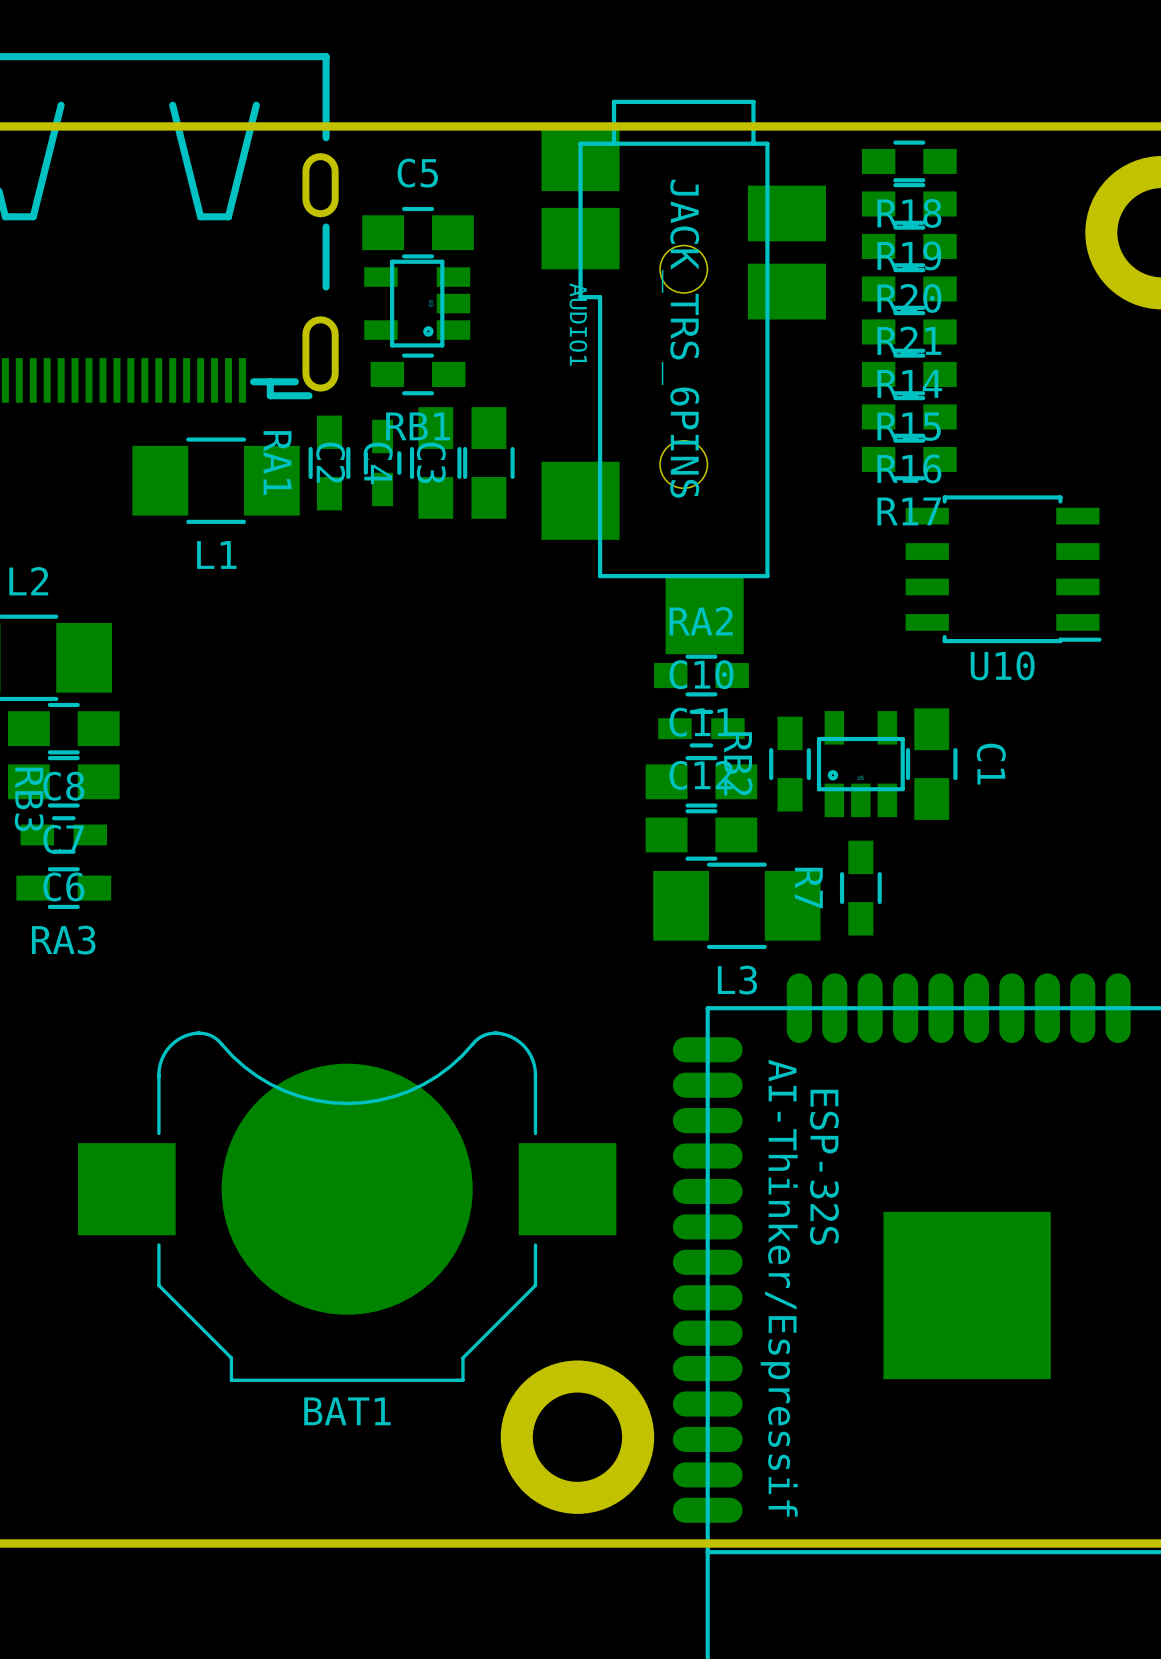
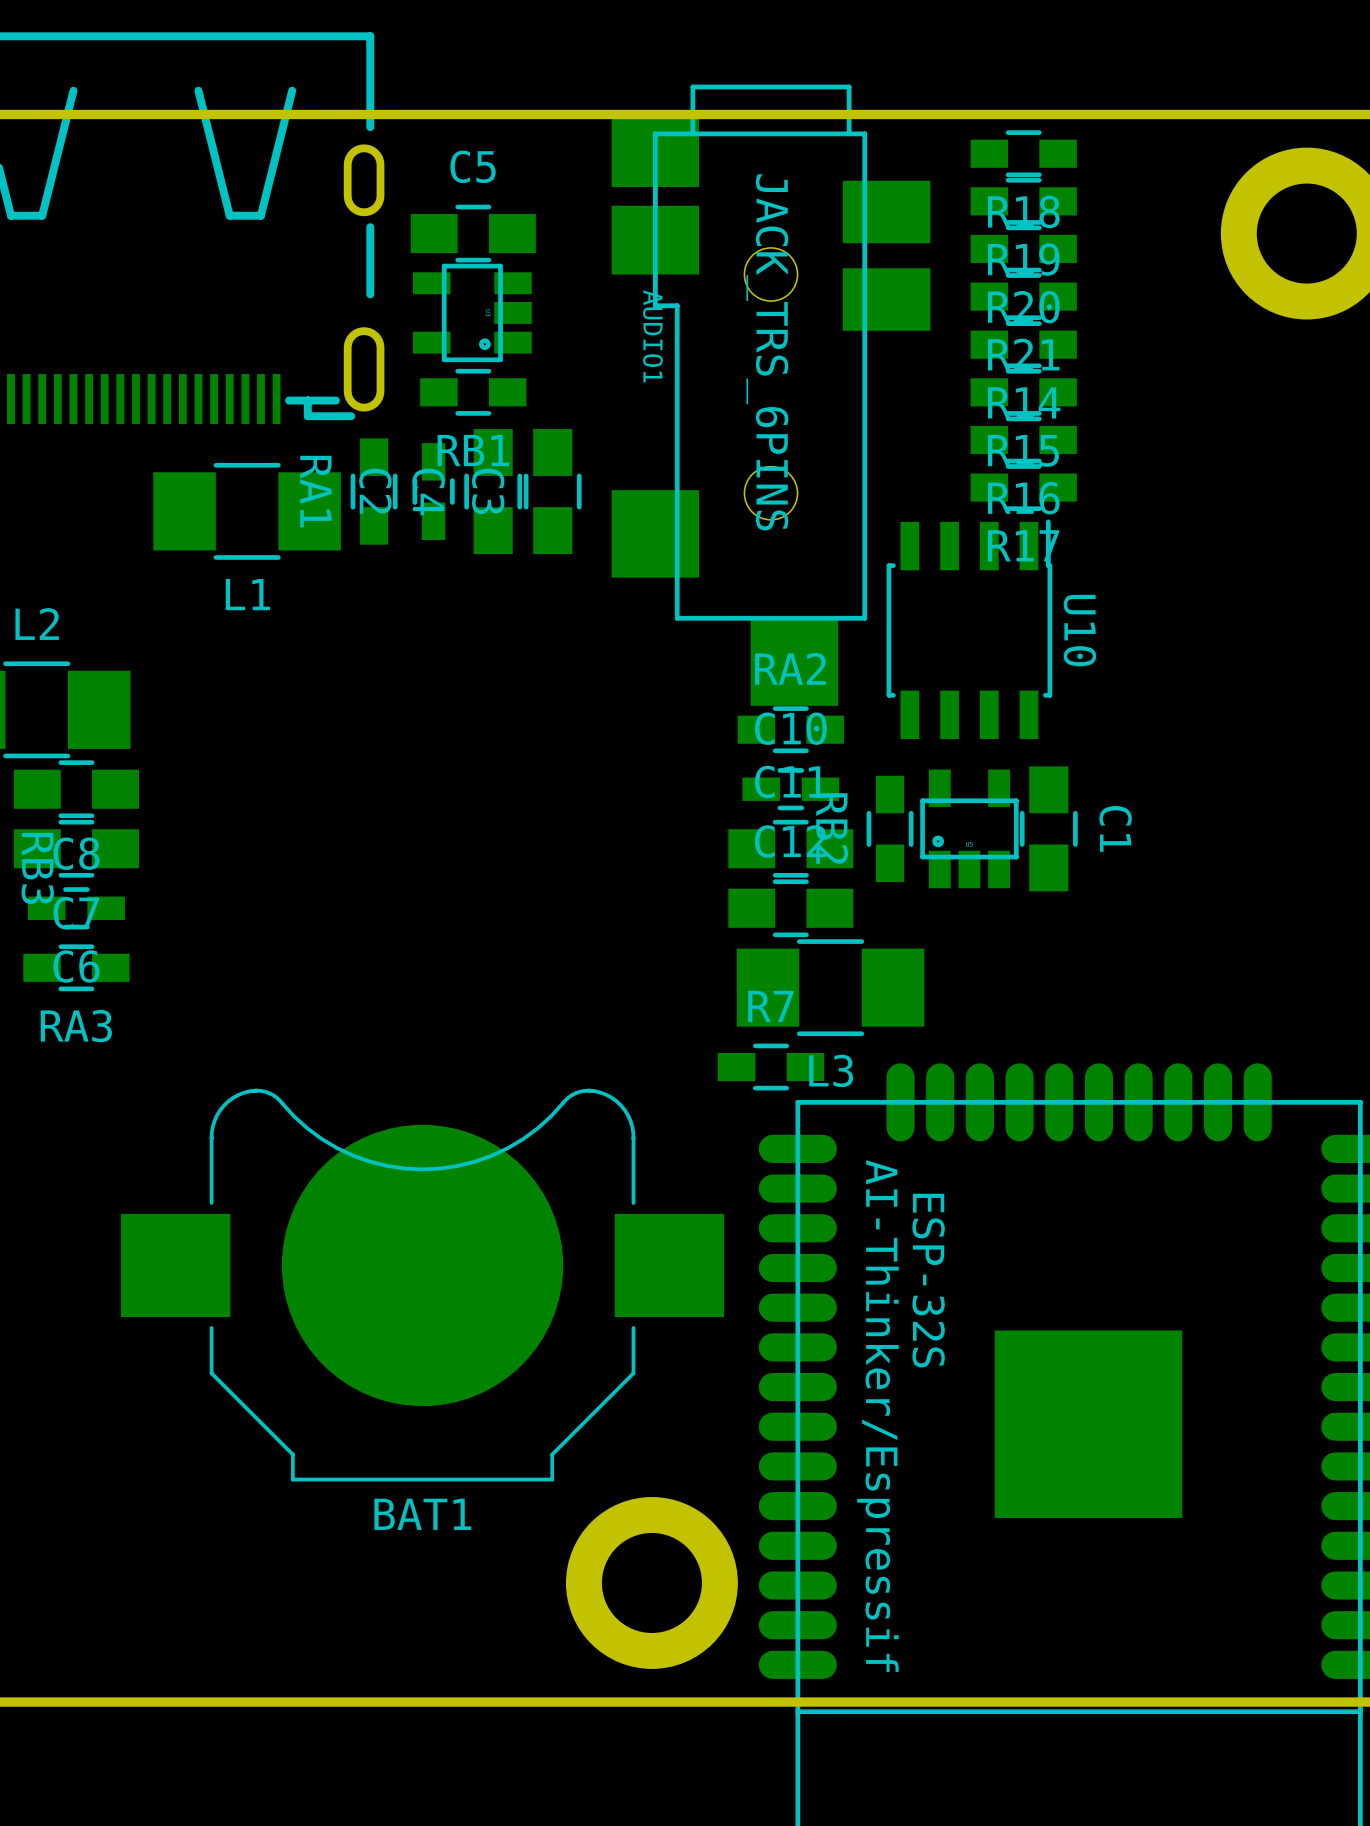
U10 rotation: 0° (1003, 569) -> 90° counterclockwise (969, 629)
U10 position: (1003, 569) -> (969, 629)
R7 rotation: 0° (860, 888) -> 90° clockwise (770, 1067)
R7 position: (860, 888) -> (770, 1067)
BAT1 position: (347, 1206) -> (422, 1285)

